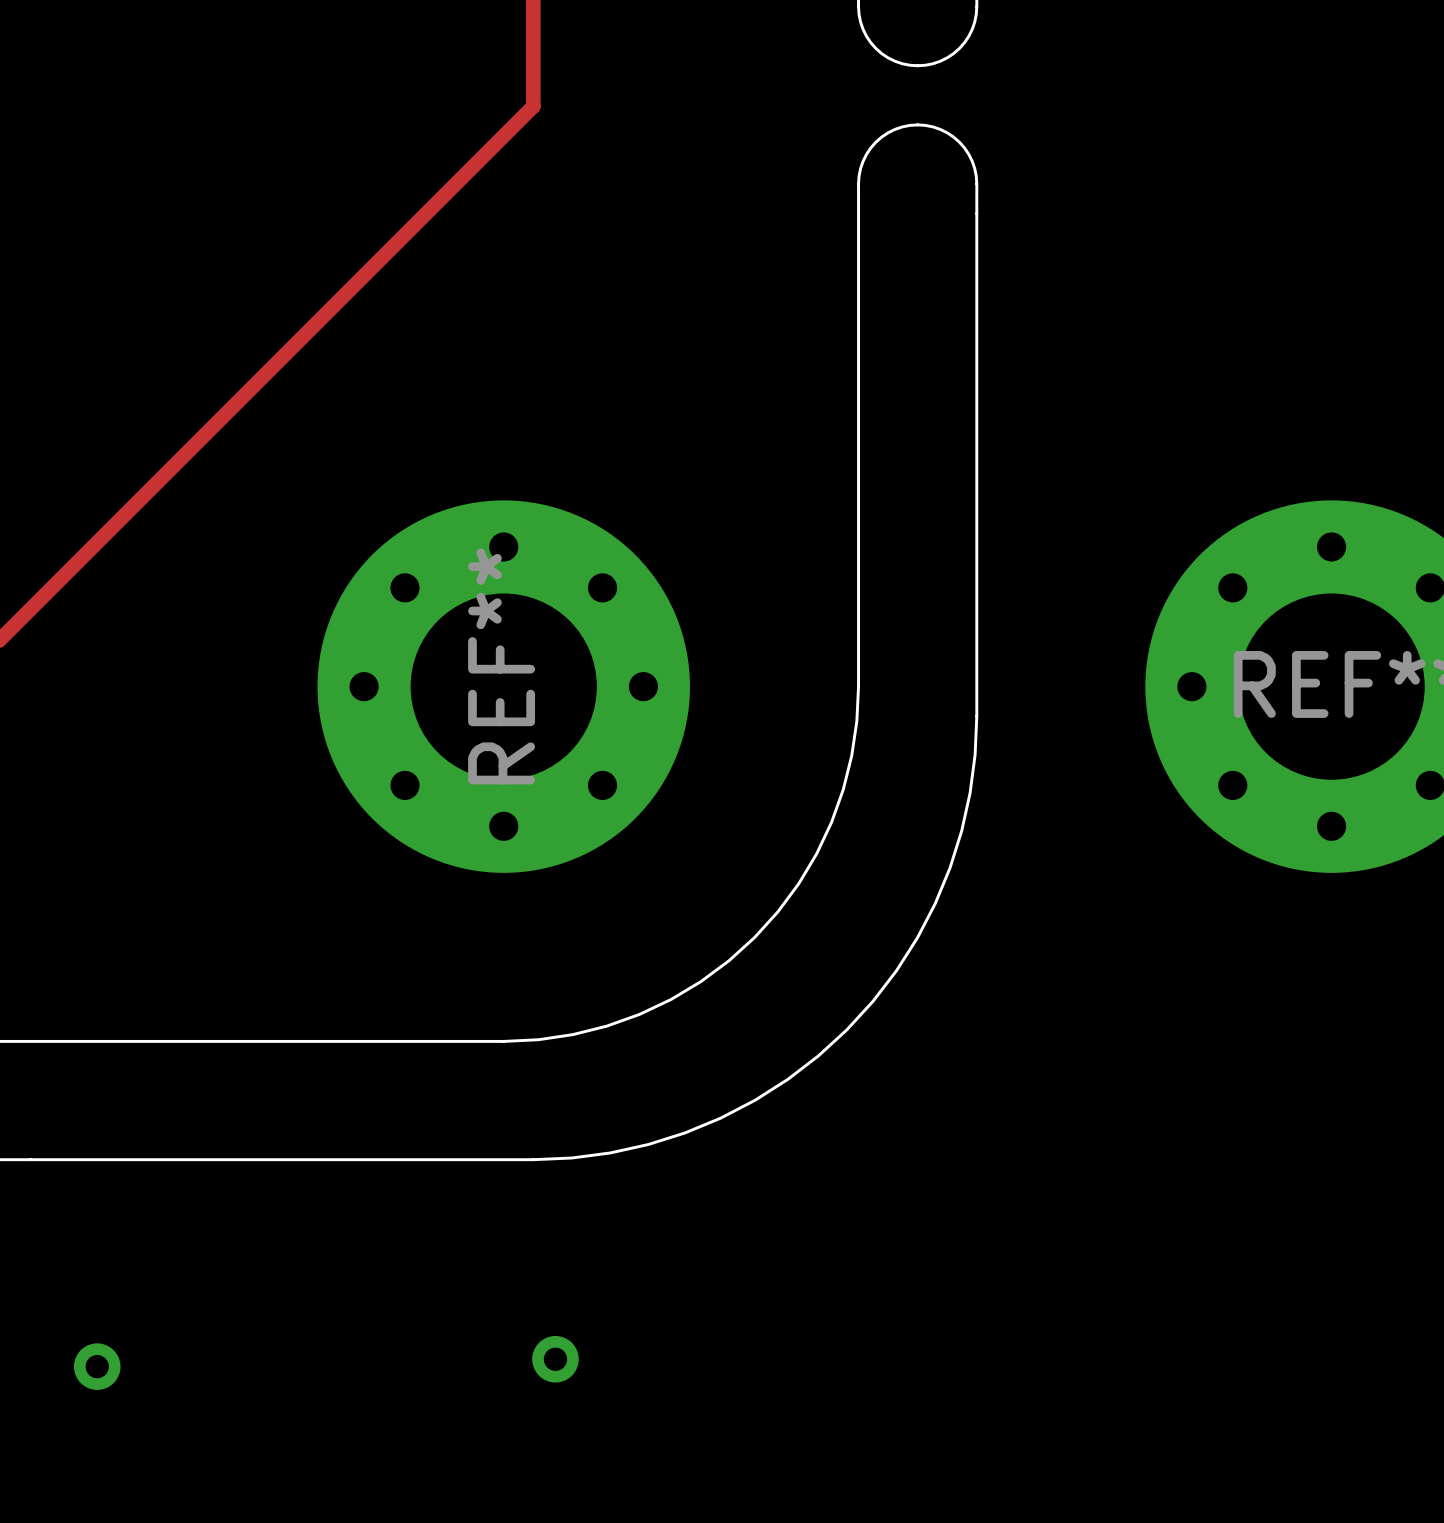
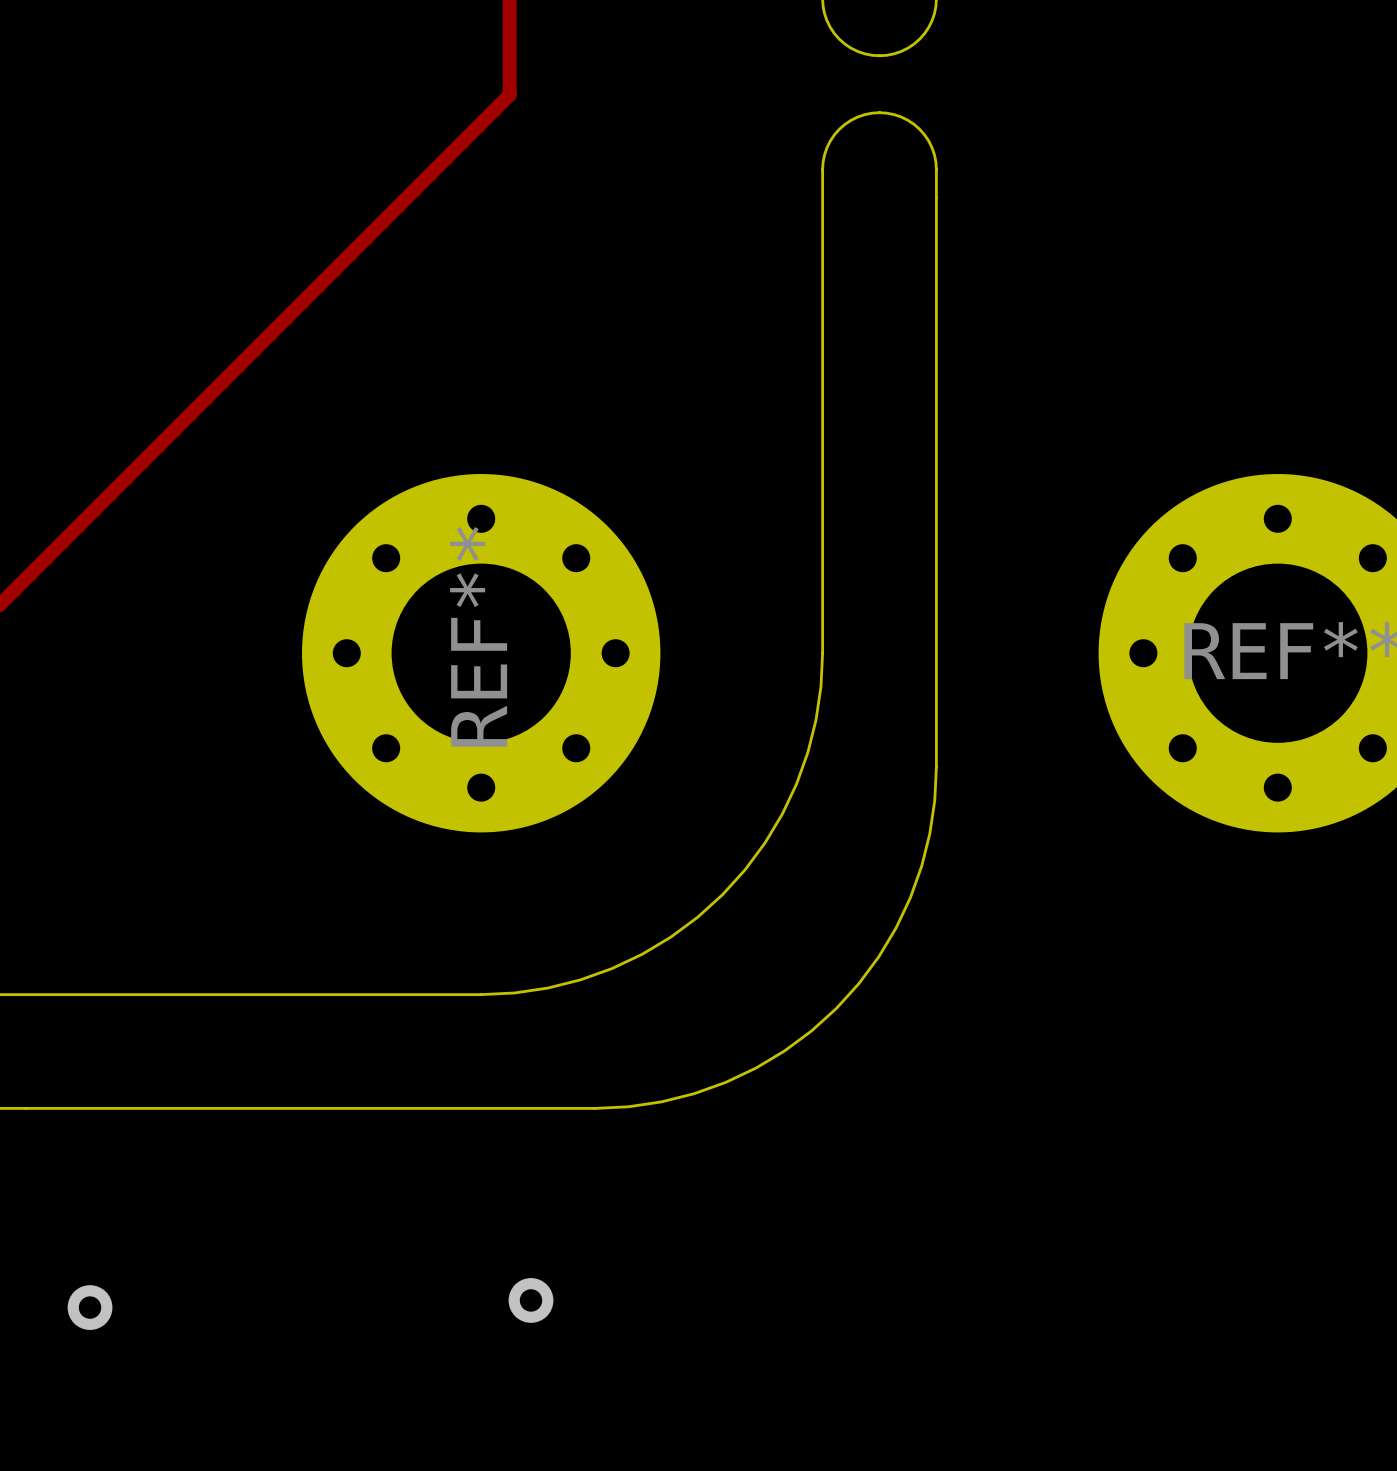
board edge: (976, 716) (975, 754) (970, 793) (961, 830) (950, 867) (935, 903) (917, 937) (896, 970) (873, 1001) (846, 1029) (818, 1055) (787, 1079) (755, 1100) (720, 1118) (684, 1132) (648, 1144) (610, 1152) (571, 1158) (533, 1159) -> (936, 681) (934, 800) (929, 833) (921, 866) (910, 897) (896, 927) (878, 956) (858, 983) (836, 1008) (811, 1030) (784, 1050) (755, 1068) (725, 1082) (694, 1093) (661, 1101) (628, 1106) (509, 1108)

